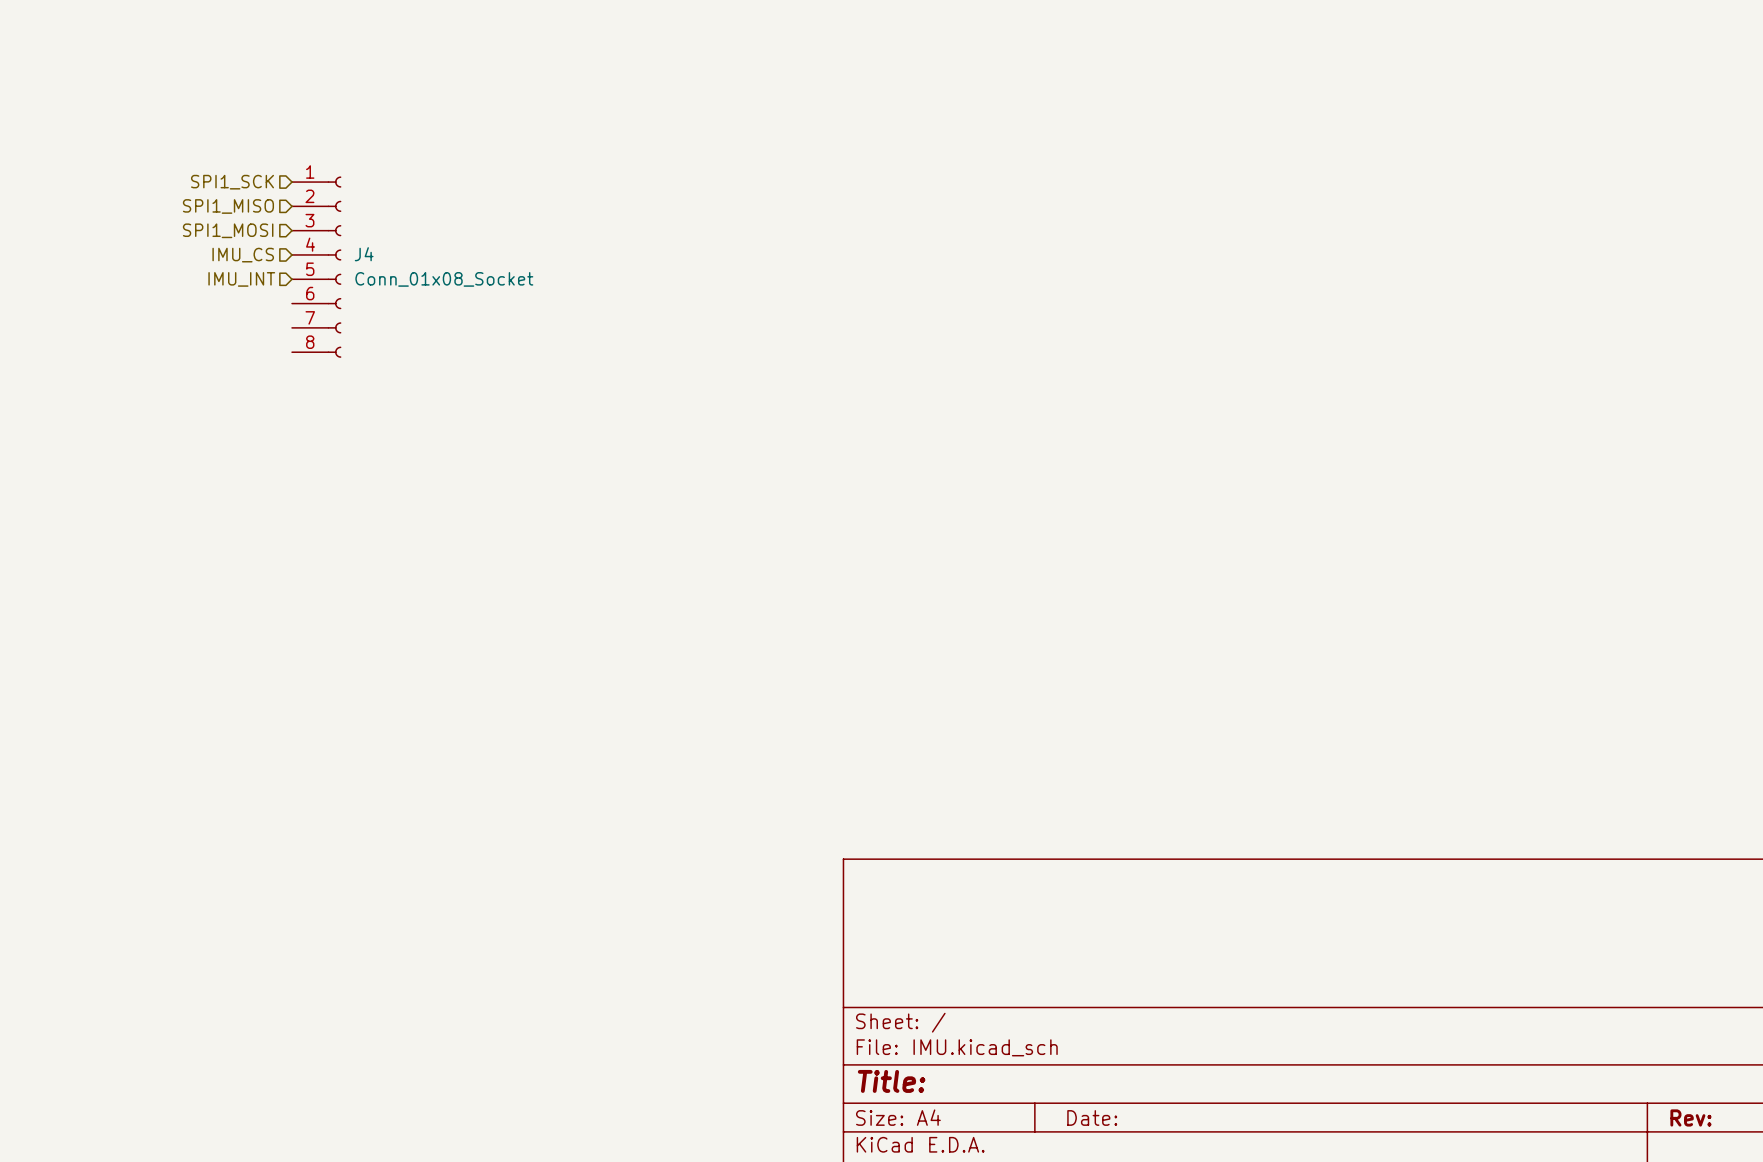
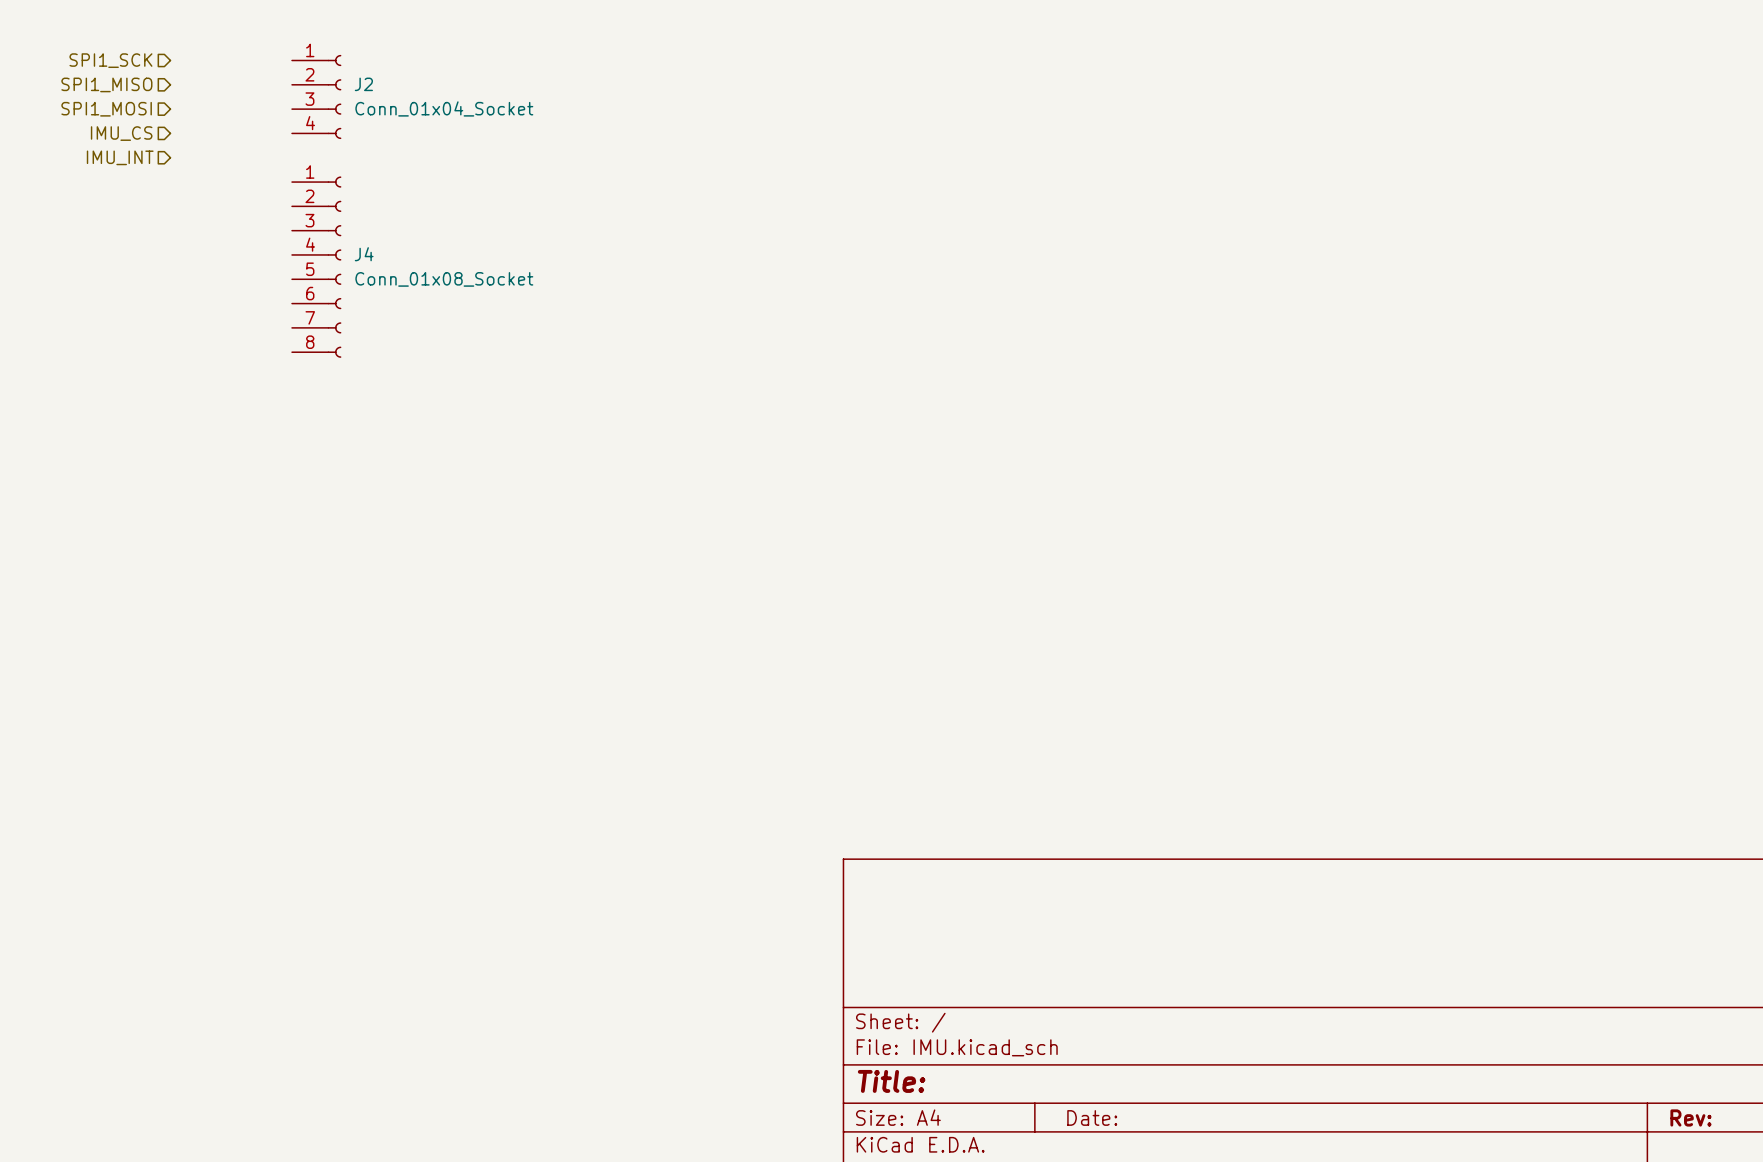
J2: none -> Conn_01x04_Socket (316, 96)
hierarchical label position: SPI1_SCK (232, 182) -> SPI1_SCK (110, 60)
hierarchical label position: SPI1_MISO (228, 206) -> SPI1_MISO (106, 84)
hierarchical label position: SPI1_MOSI (228, 230) -> SPI1_MOSI (106, 109)
hierarchical label position: IMU_CS (243, 255) -> IMU_CS (121, 133)
hierarchical label position: IMU_INT (241, 279) -> IMU_INT (120, 157)

